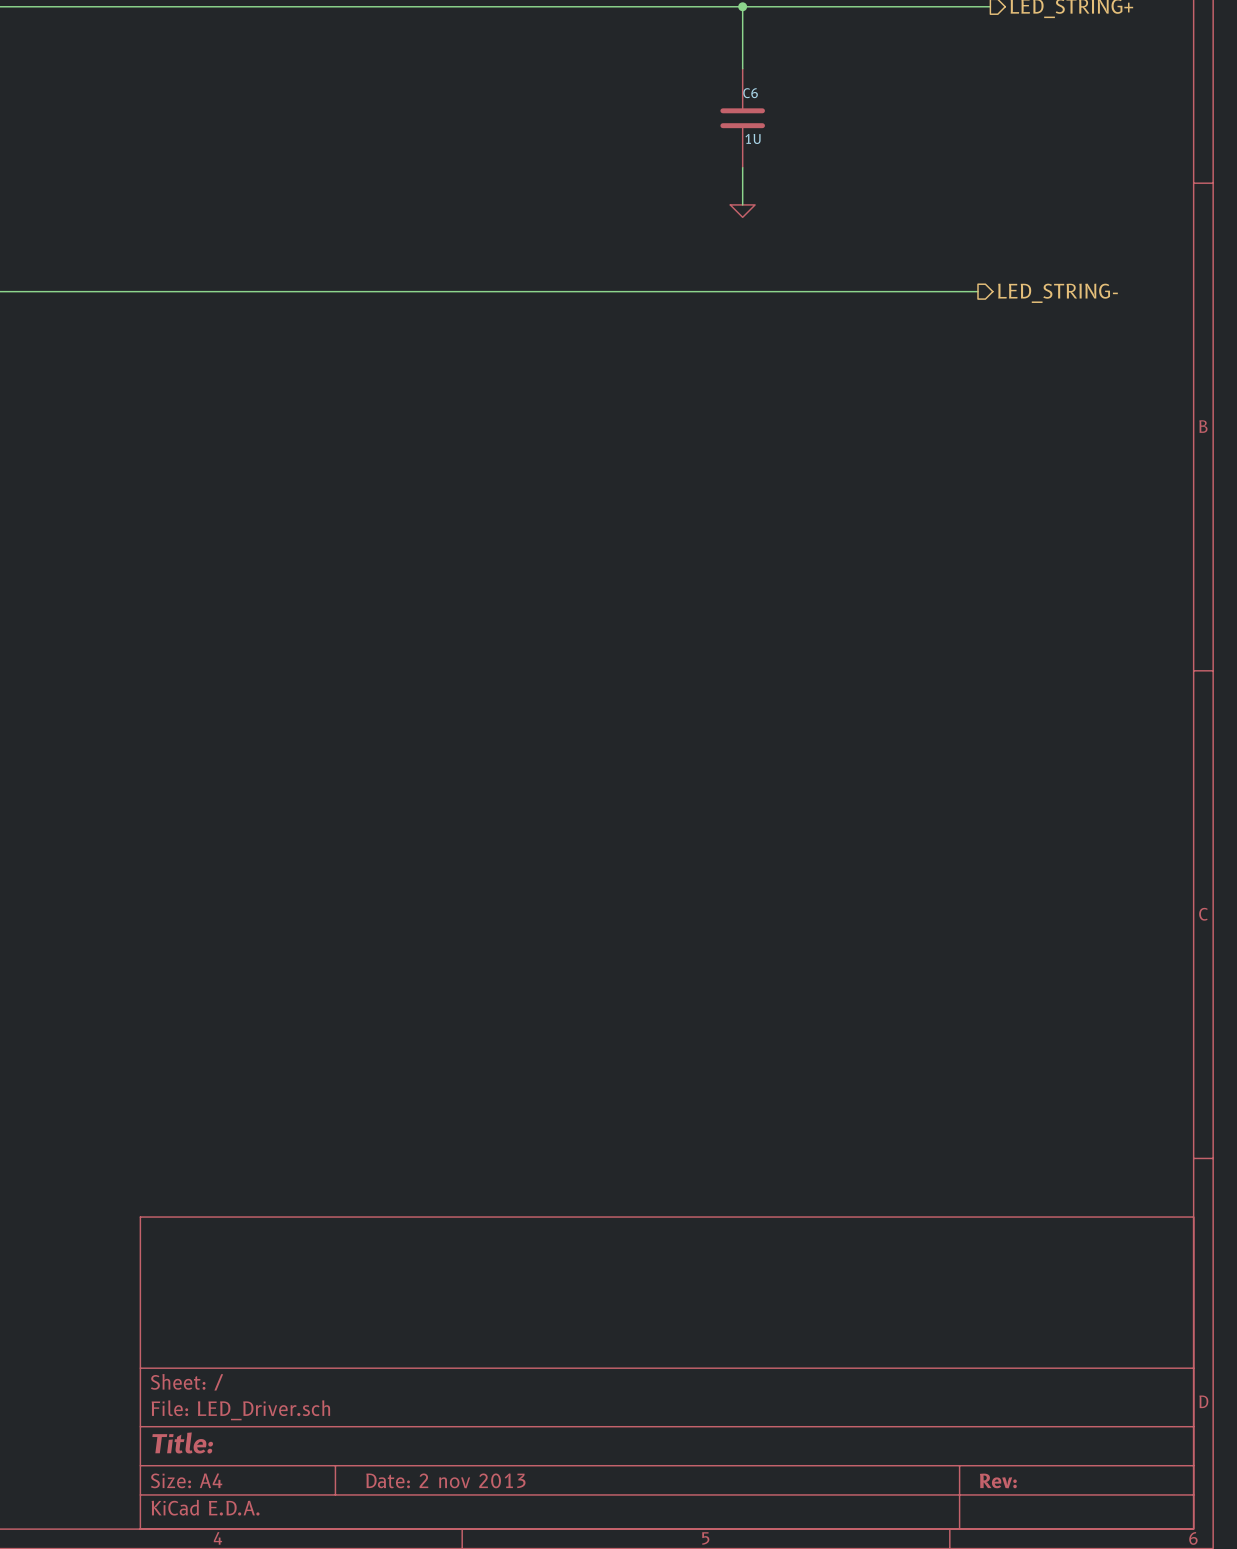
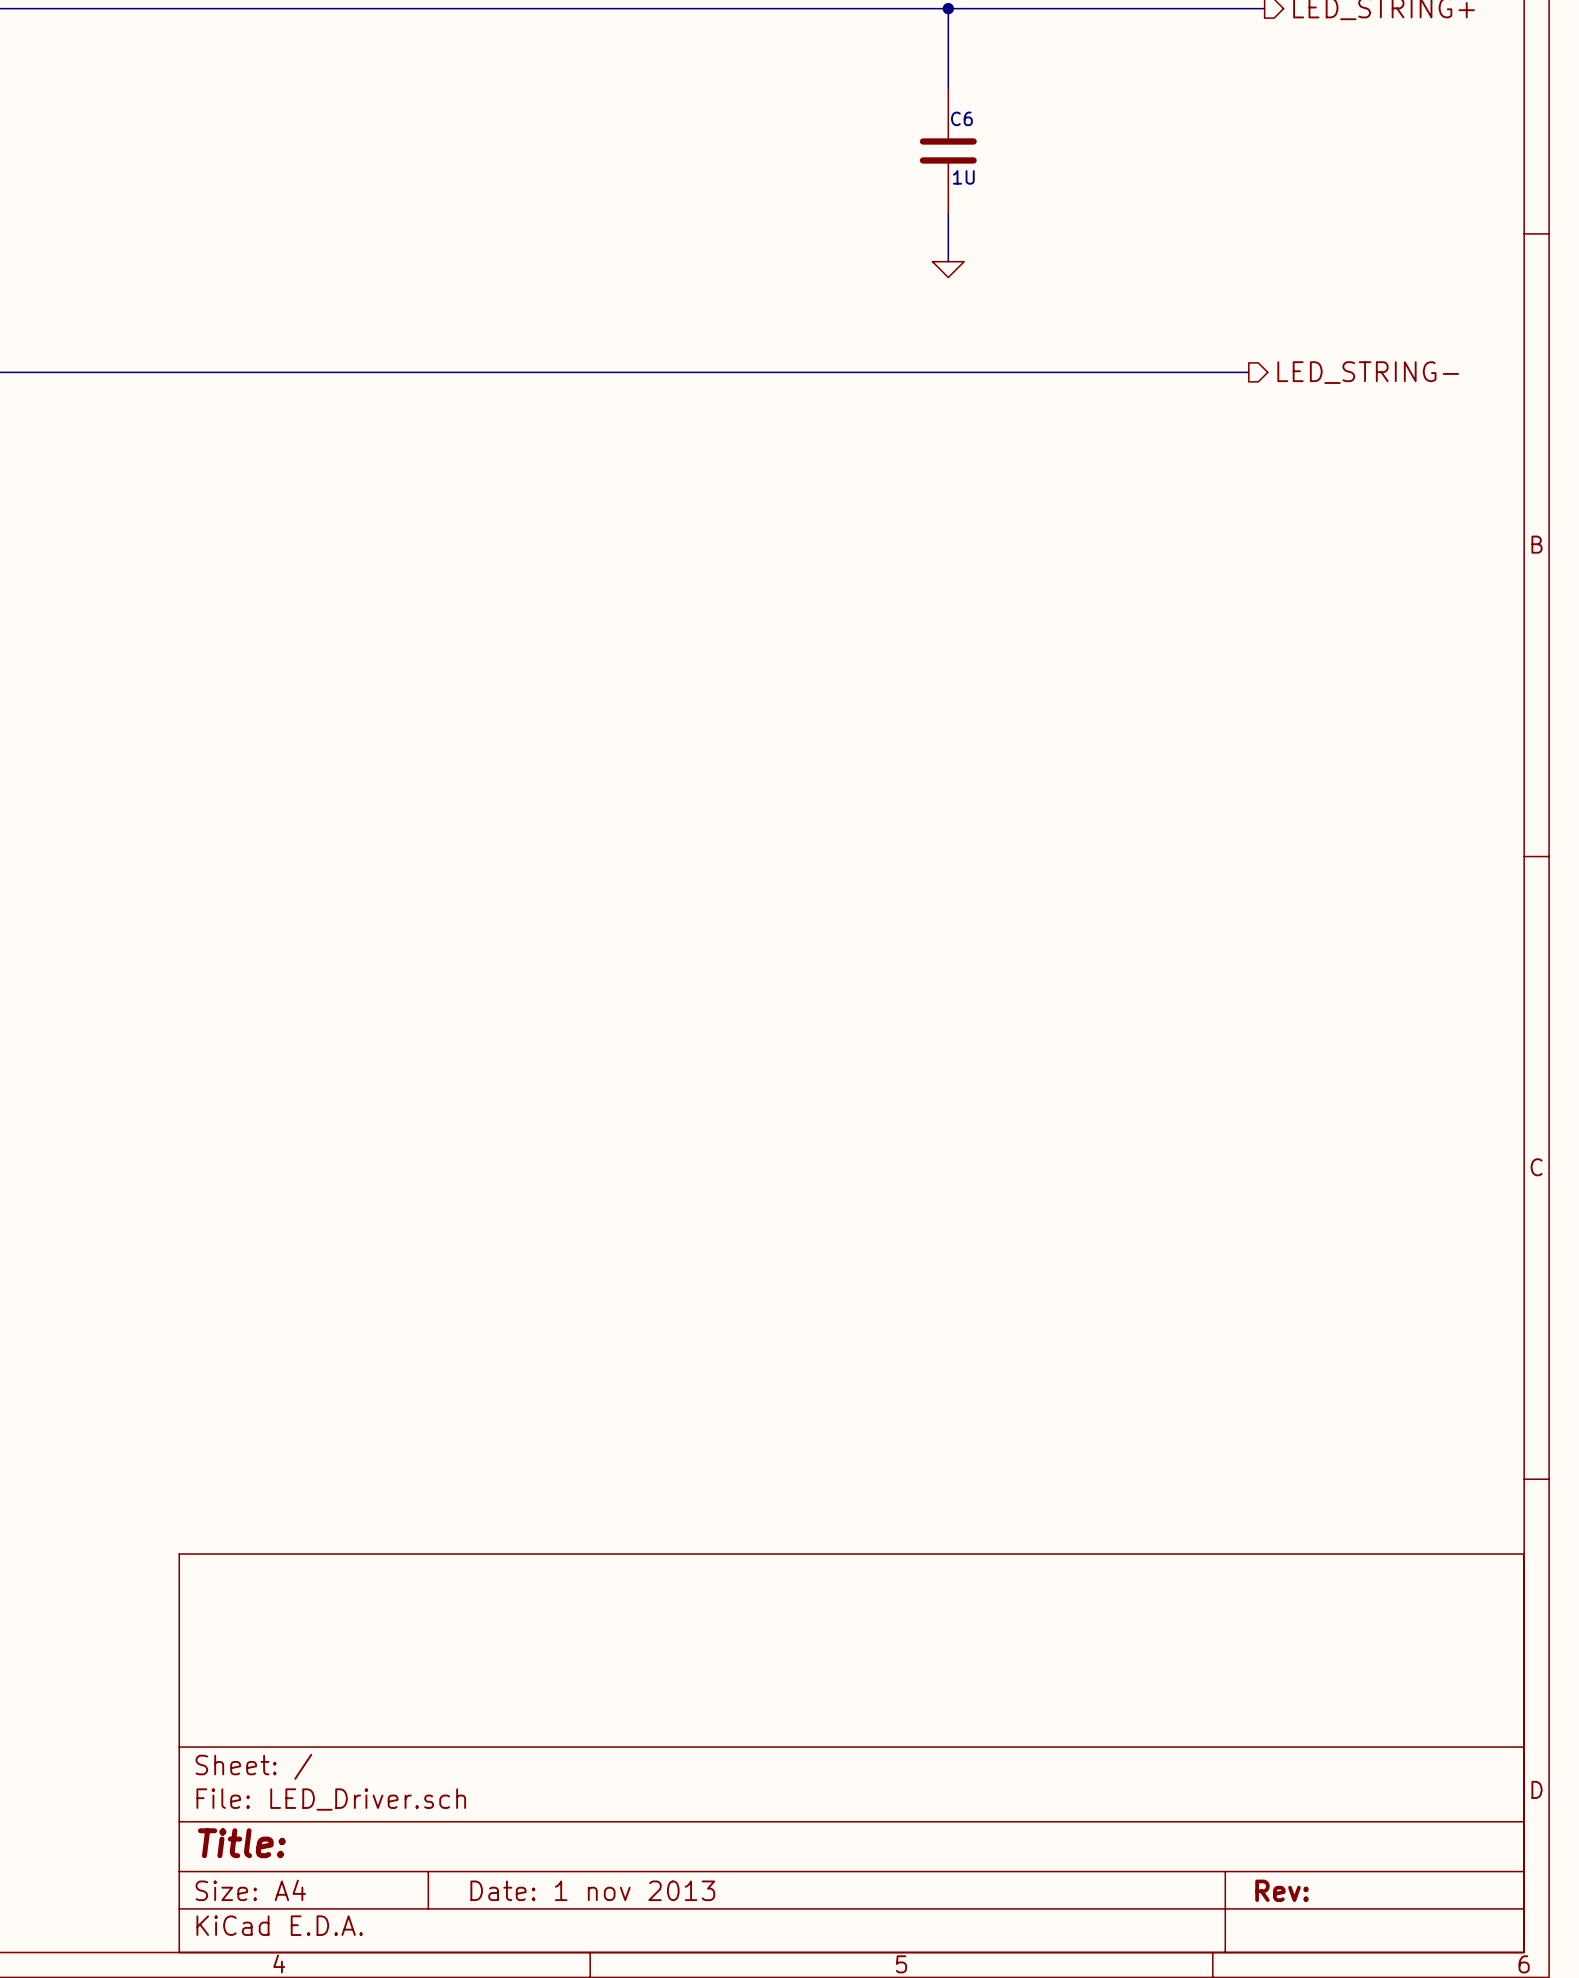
title block: Date: 2 nov 2013 (445, 1480) -> Date: 1 nov 2013 (592, 1890)

